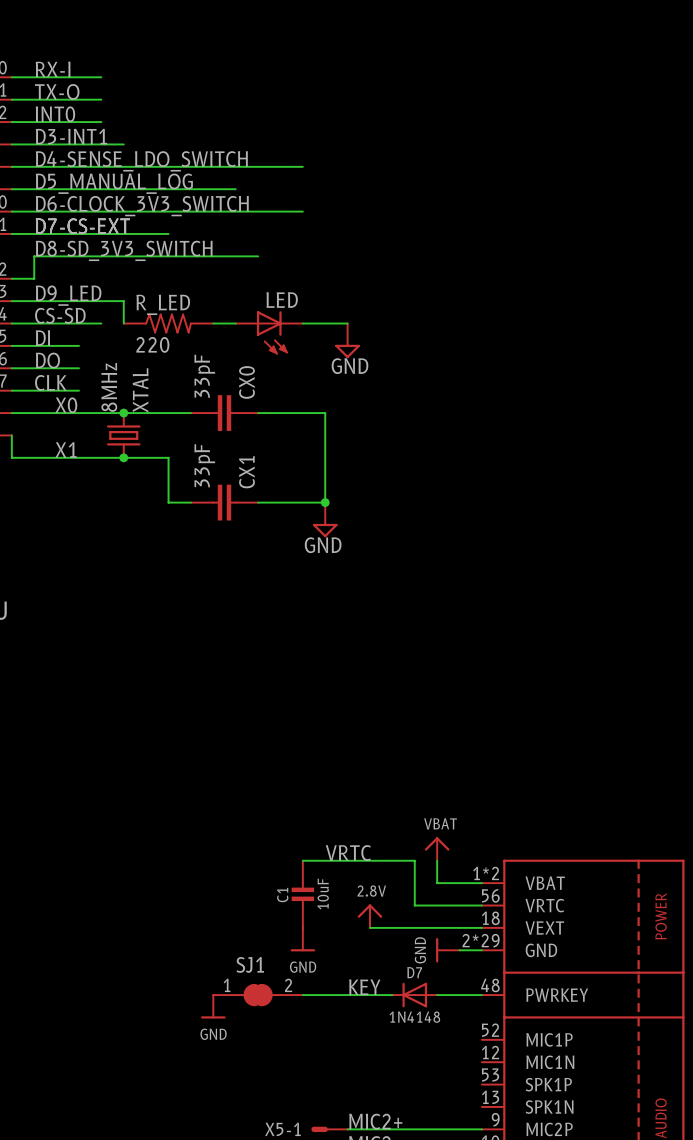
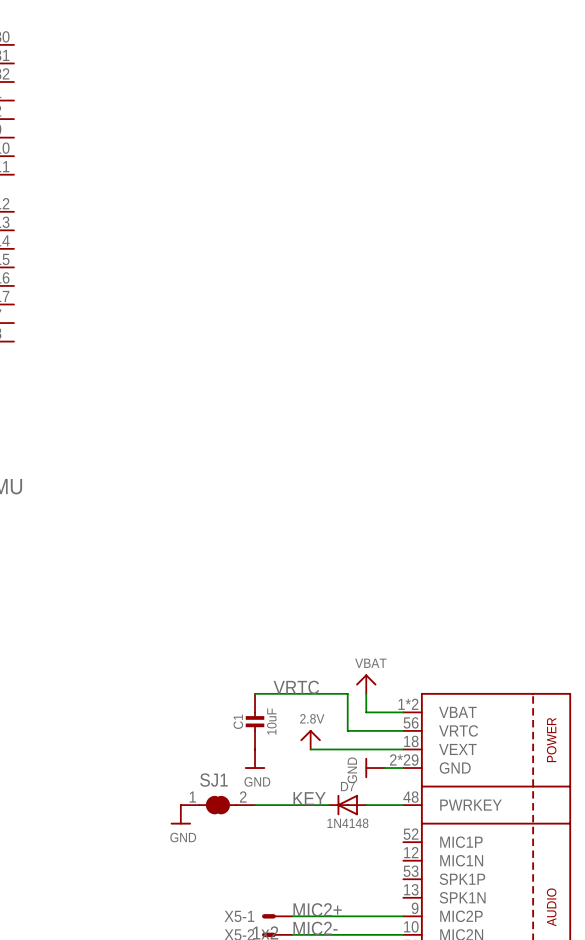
label: RX-I (53, 69) -> none
wire: (11, 77) (101, 77) -> none
label: TX-O (57, 91) -> none
wire: (11, 99) (101, 99) -> none
label: INT0 (55, 114) -> none
wire: (11, 122) (101, 122) -> none
label: D3-INT1 (71, 136) -> none
wire: (11, 144) (123, 144) -> none
label: D4-SENSE_LDO_SWITCH (141, 161) -> none
wire: (11, 166) (302, 166) -> none
label: D5_MANUAL_LOG (114, 183) -> none
wire: (11, 189) (235, 189) -> none
label: D6-CLOCK_3V3_SWITCH (142, 206) -> none
wire: (11, 211) (302, 211) -> none
label: D7-CS-EXT (82, 226) -> none
wire: (11, 233) (168, 233) -> none
label: D8-SD_3V3_SWITCH (124, 250) -> none
wire: (258, 256) (34, 256) (34, 278) (11, 278) -> none
label: D9_LED (68, 295) -> none
wire: (11, 301) (123, 301) (123, 323) -> none
label: CS-SD (60, 315) -> none
wire: (11, 323) (101, 323) -> none
R_LED: 220 (168, 323) -> none
wire: (213, 323) (235, 323) -> none
wire: (302, 323) (347, 323) -> none
LED: (269, 332) -> none
label: DI (42, 338) -> none
power symbol: GND (347, 340) -> none
wire: (11, 345) (79, 345) -> none
label: DO (47, 360) -> none
wire: (11, 368) (79, 368) -> none
label: CLK (50, 382) -> none
wire: (11, 390) (79, 390) -> none
label: X0 (66, 405) -> none
wire: (11, 413) (190, 413) -> none
junction: (123, 413) -> none
CX0: 33pF (224, 413) -> none
wire: (258, 413) (325, 413) (325, 502) (258, 502) -> none
wire: (11, 435) (11, 457) (168, 457) (168, 502) (190, 502) -> none
XTAL: 8MHz (123, 435) -> none
label: X1 (66, 449) -> none
junction: (123, 457) -> none
CX1: 33pF (224, 502) -> none
junction: (325, 502) -> none
power symbol: GND (325, 519) -> none

